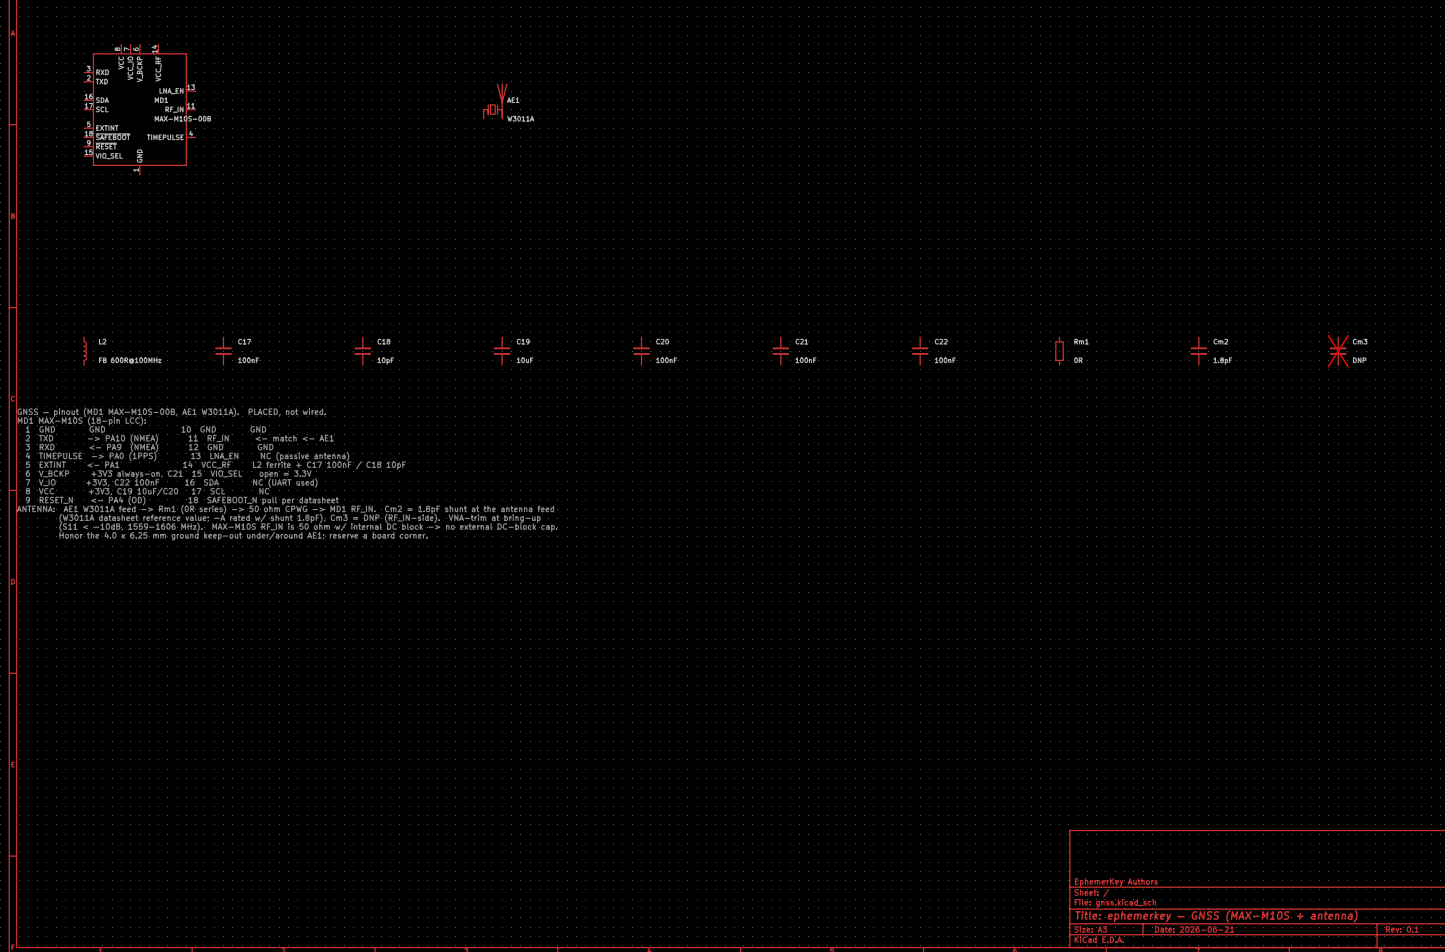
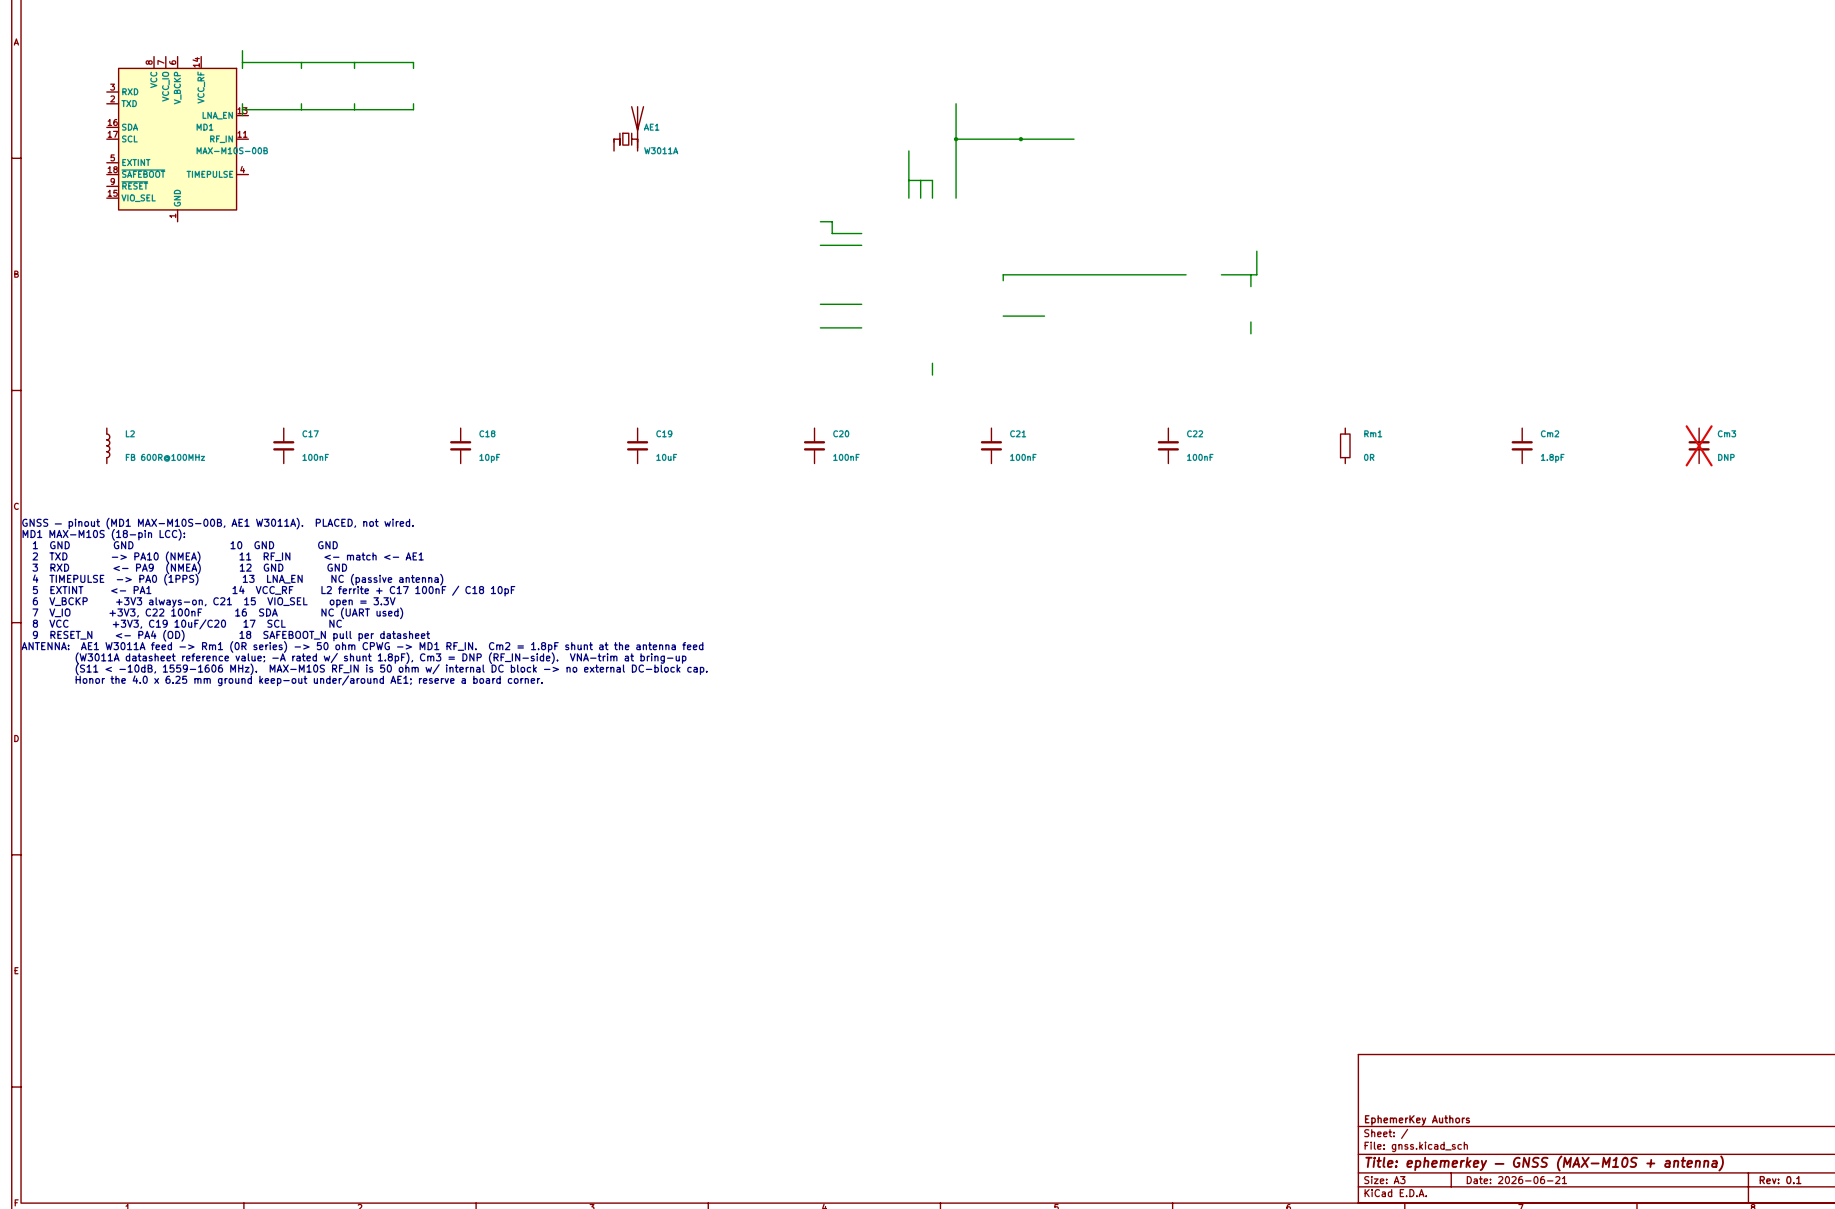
wire: none -> (242, 50) (242, 68)
wire: none -> (242, 62) (413, 62) (413, 68)
wire: none -> (301, 62) (301, 68)
wire: none -> (354, 62) (354, 68)
wire: none -> (242, 103) (242, 115)
wire: none -> (301, 103) (301, 109)
wire: none -> (354, 103) (354, 109)
wire: none -> (413, 103) (413, 109) (242, 109)
wire: none -> (956, 103) (956, 198)
wire: none -> (956, 139) (1074, 139)
junction: none -> (956, 139)
junction: none -> (1020, 139)
wire: none -> (908, 150) (908, 198)
wire: none -> (908, 180) (932, 180) (932, 198)
wire: none -> (920, 180) (920, 198)
wire: none -> (820, 221) (832, 221) (832, 233) (861, 233)
wire: none -> (820, 245) (861, 245)
wire: none -> (1256, 251) (1256, 274) (1221, 274)
wire: none -> (1186, 274) (1003, 274) (1003, 280)
wire: none -> (1250, 274) (1250, 286)
wire: none -> (820, 304) (861, 304)
wire: none -> (1003, 316) (1044, 316)
wire: none -> (1250, 321) (1250, 333)
wire: none -> (820, 327) (861, 327)
wire: none -> (932, 363) (932, 375)

